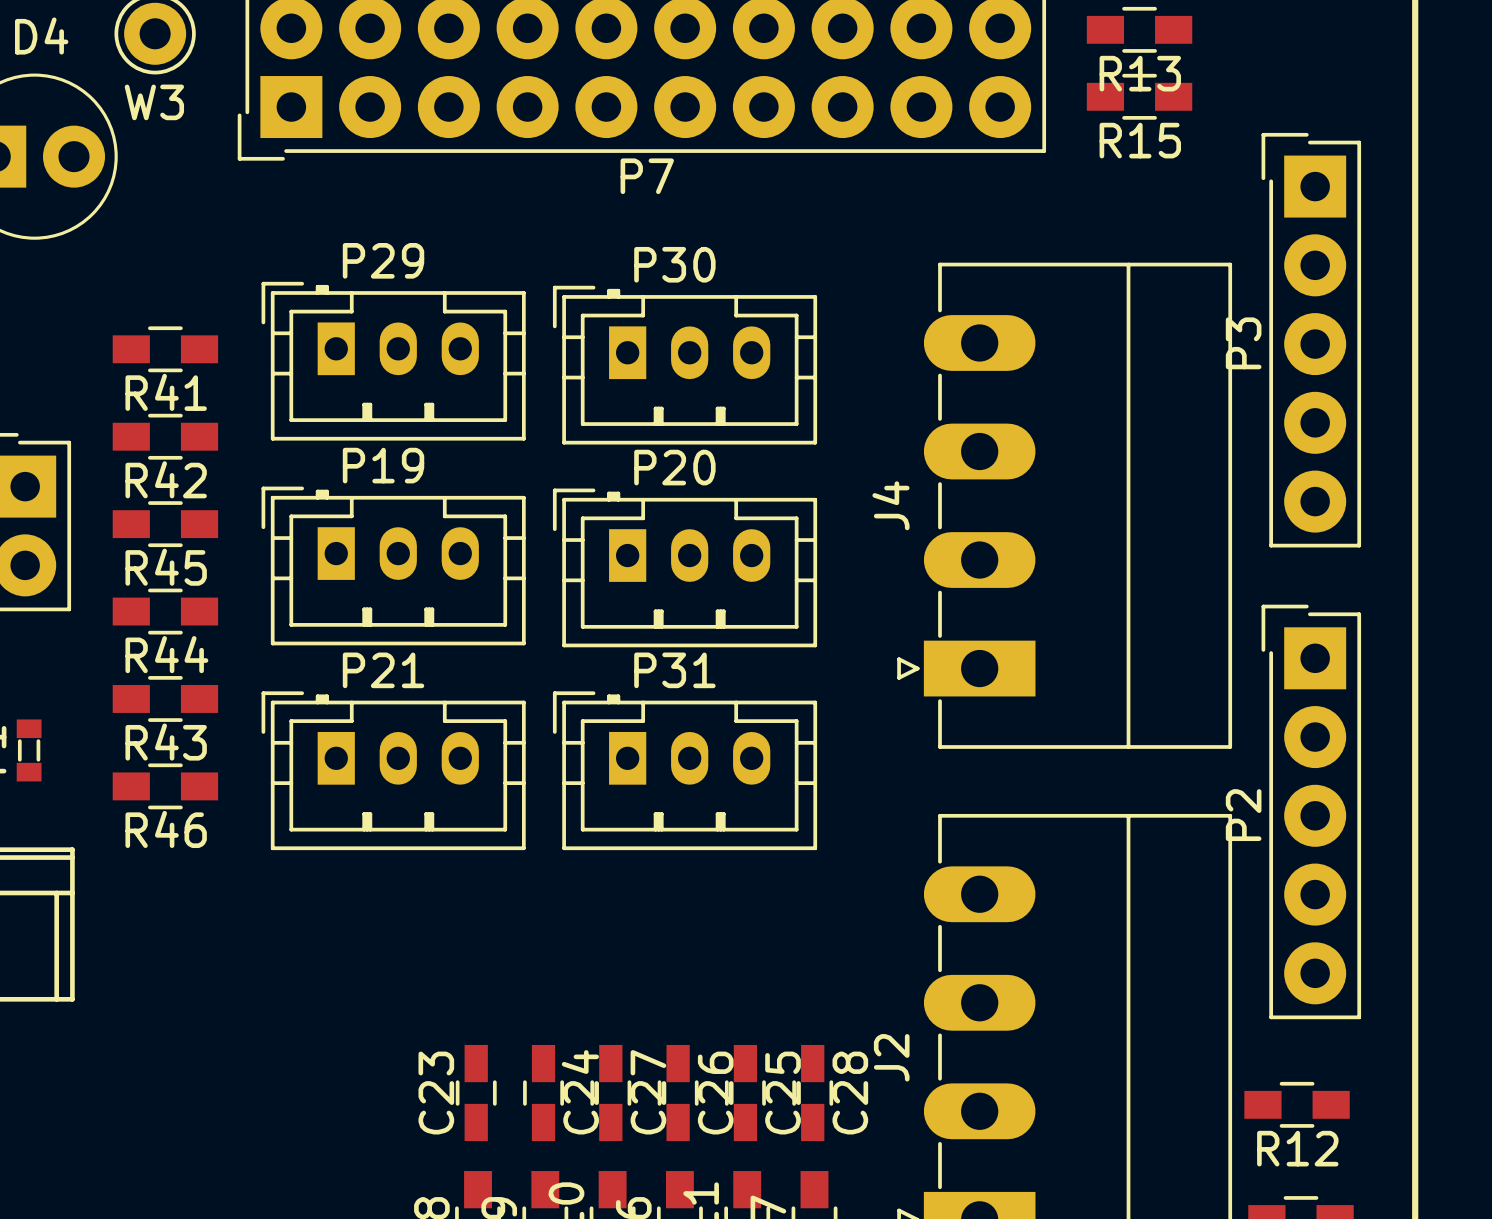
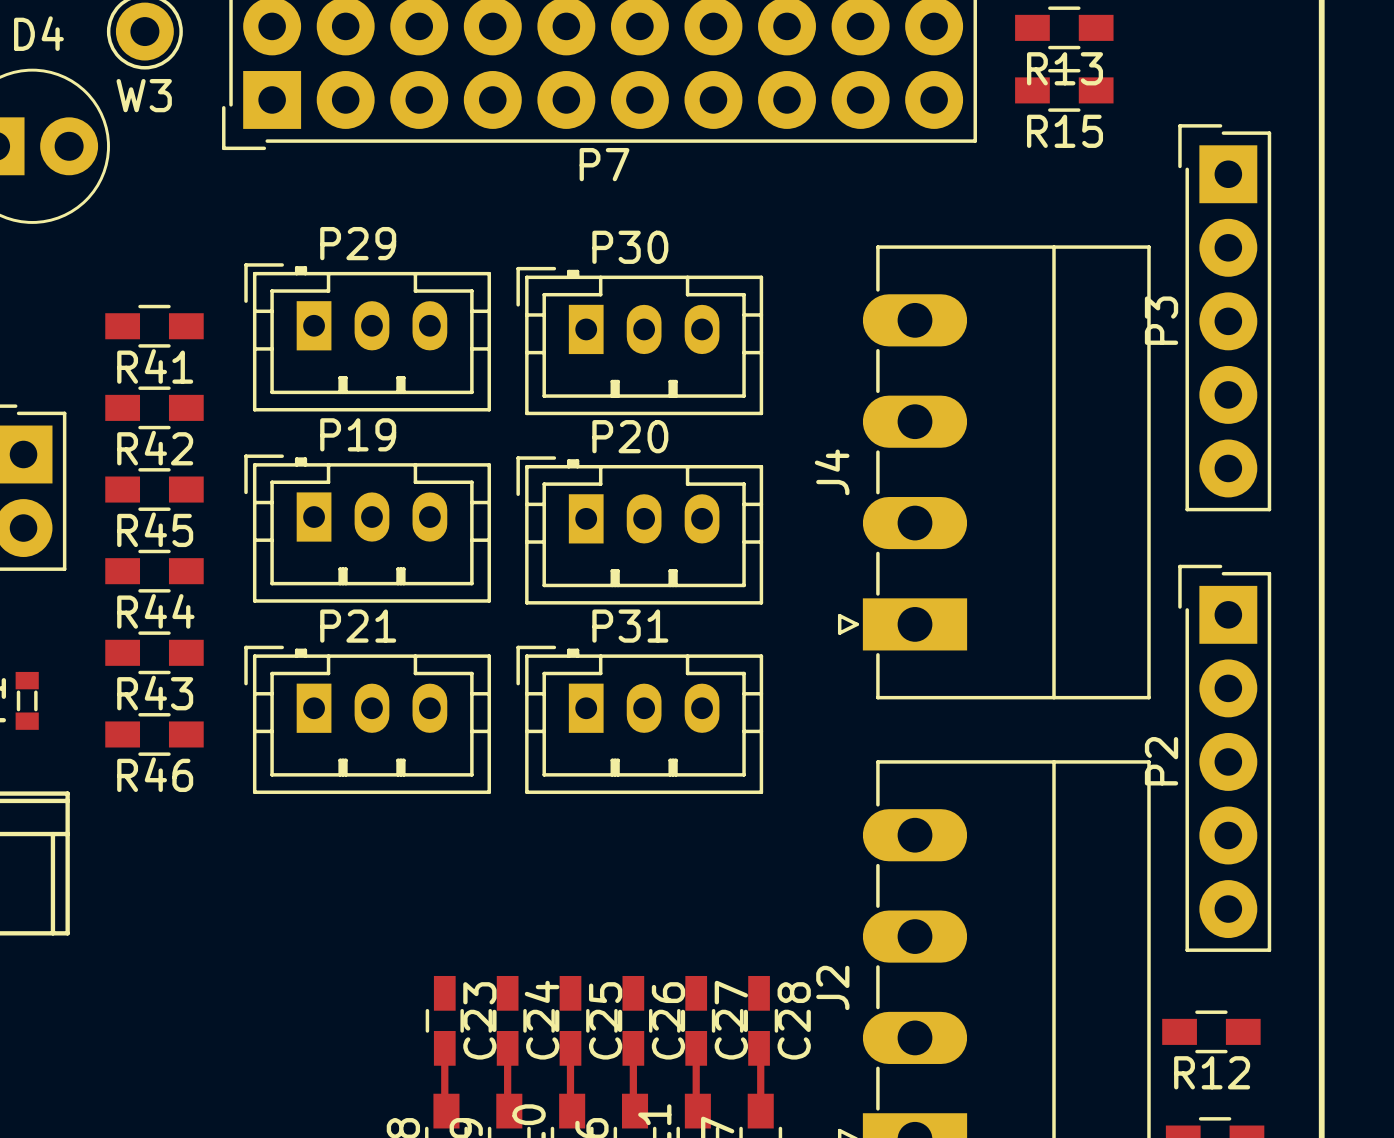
C27 name: C27 (648, 1092) -> C25 (605, 1020)
C23 name position: C23 (436, 1093) -> C23 (479, 1020)
C25 name: C25 (783, 1093) -> C27 (731, 1020)
track: none -> (444, 1048) (444, 1109) (446, 1111)
track: none -> (507, 1048) (507, 1109) (509, 1111)
track: none -> (633, 1048) (633, 1109) (635, 1111)
track: none -> (696, 1048) (696, 1109) (697, 1111)
track: none -> (759, 1048) (760, 1050) (760, 1111)
track: none -> (570, 1050) (570, 1109) (572, 1111)

